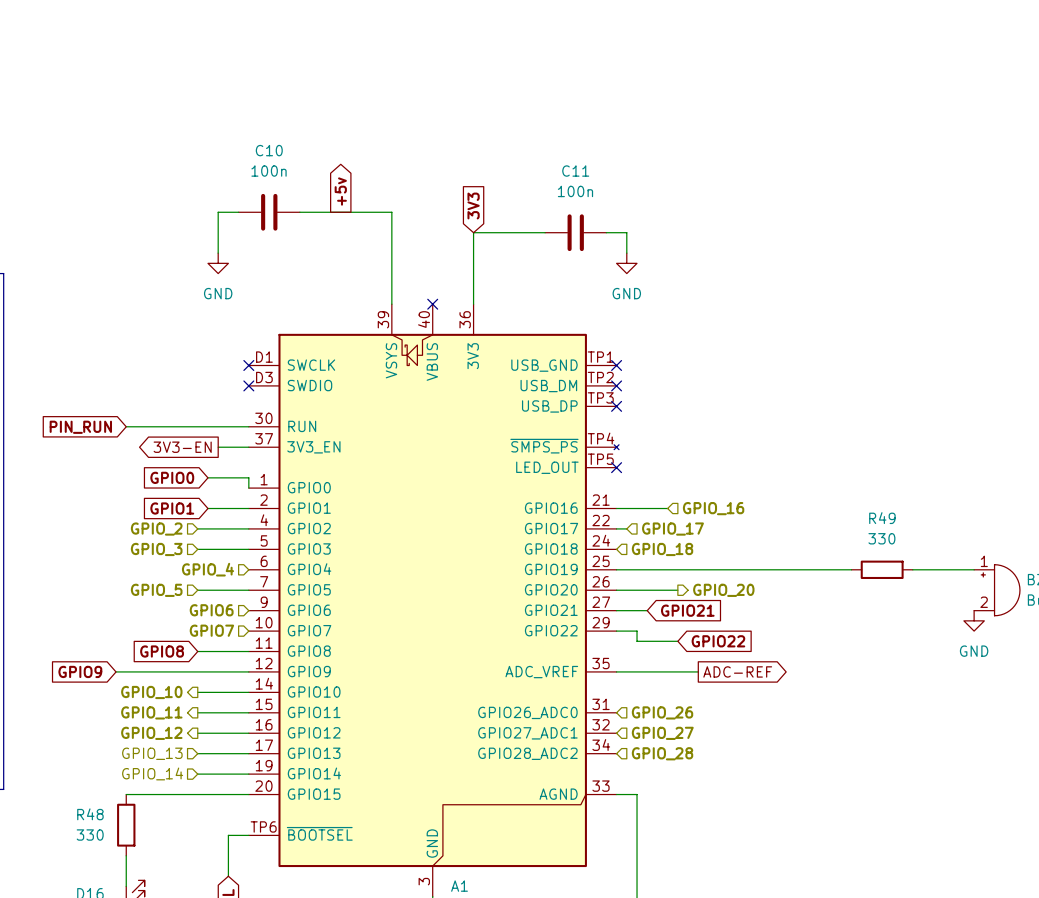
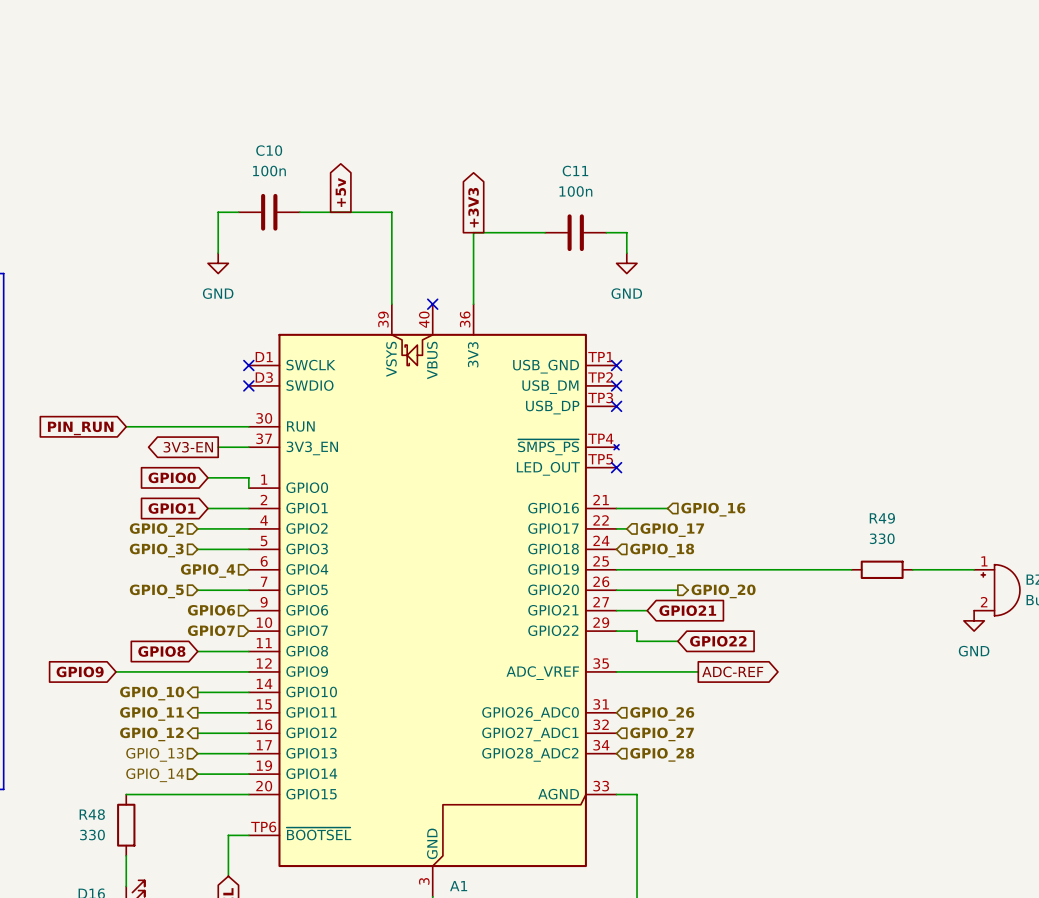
global label shape: input (473, 206) -> output (473, 207)
global label: 3V3 (473, 206) -> +3V3 (473, 207)

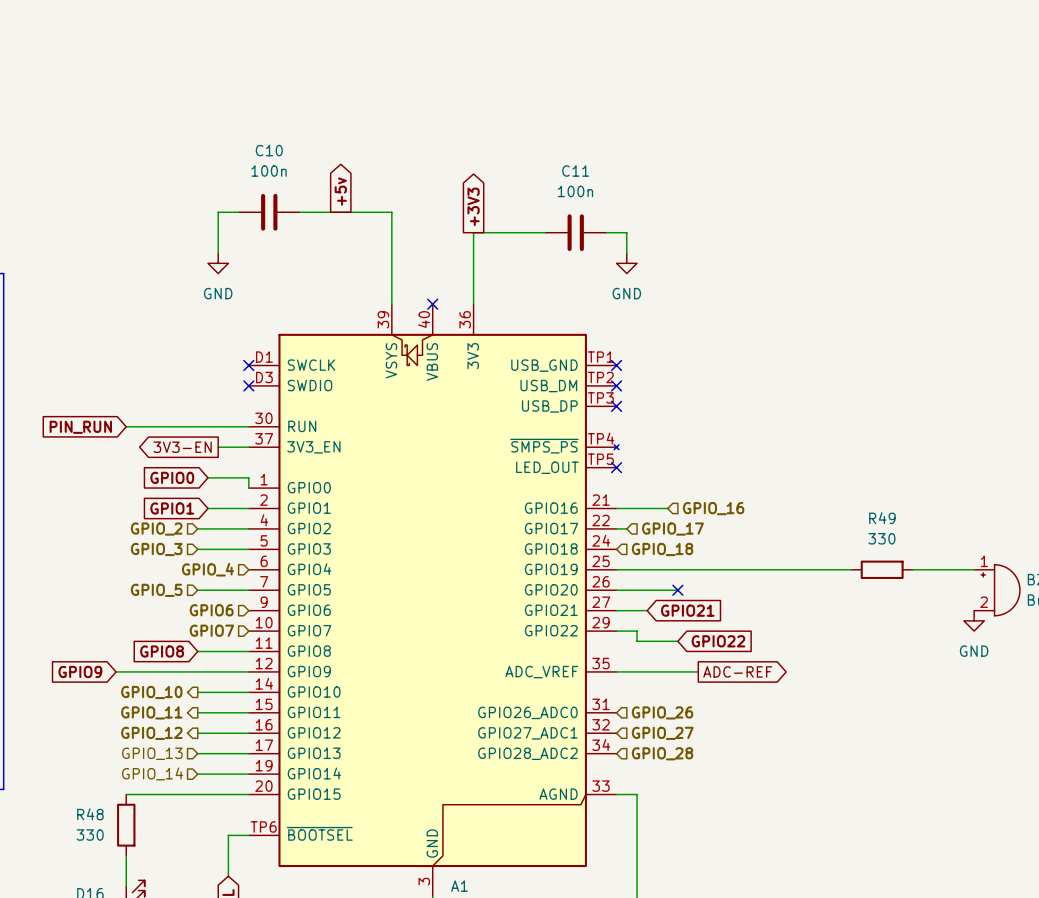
no-connect mark: none -> (677, 590)
hierarchical label: GPIO_20 (723, 591) -> none

